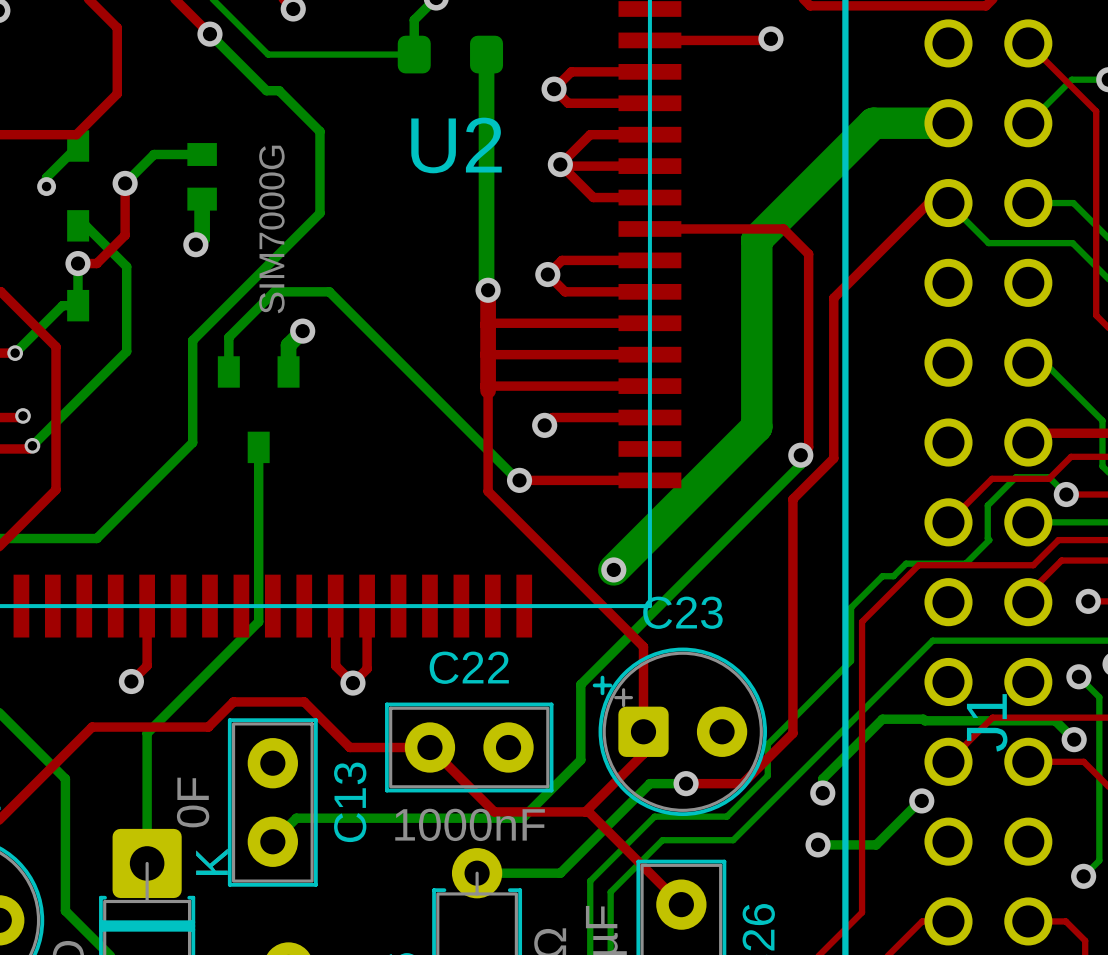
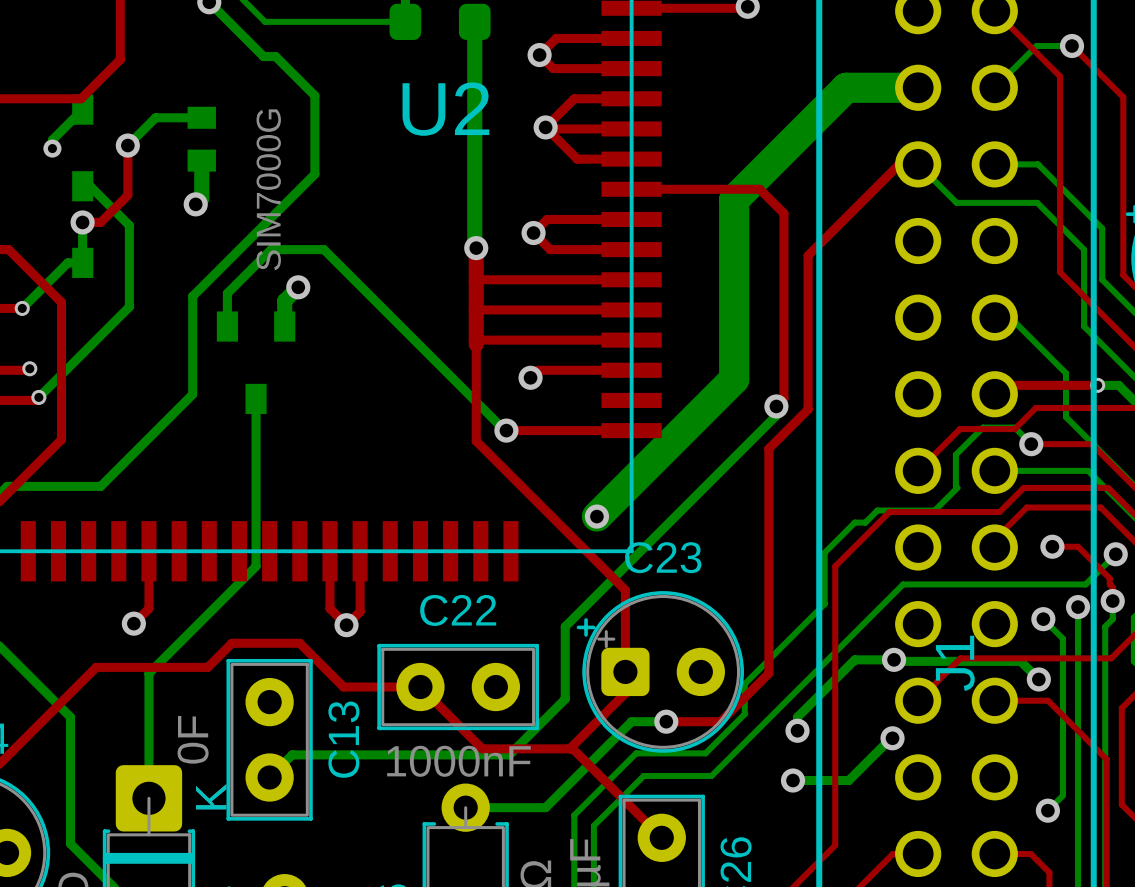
via: none -> (894, 659)

